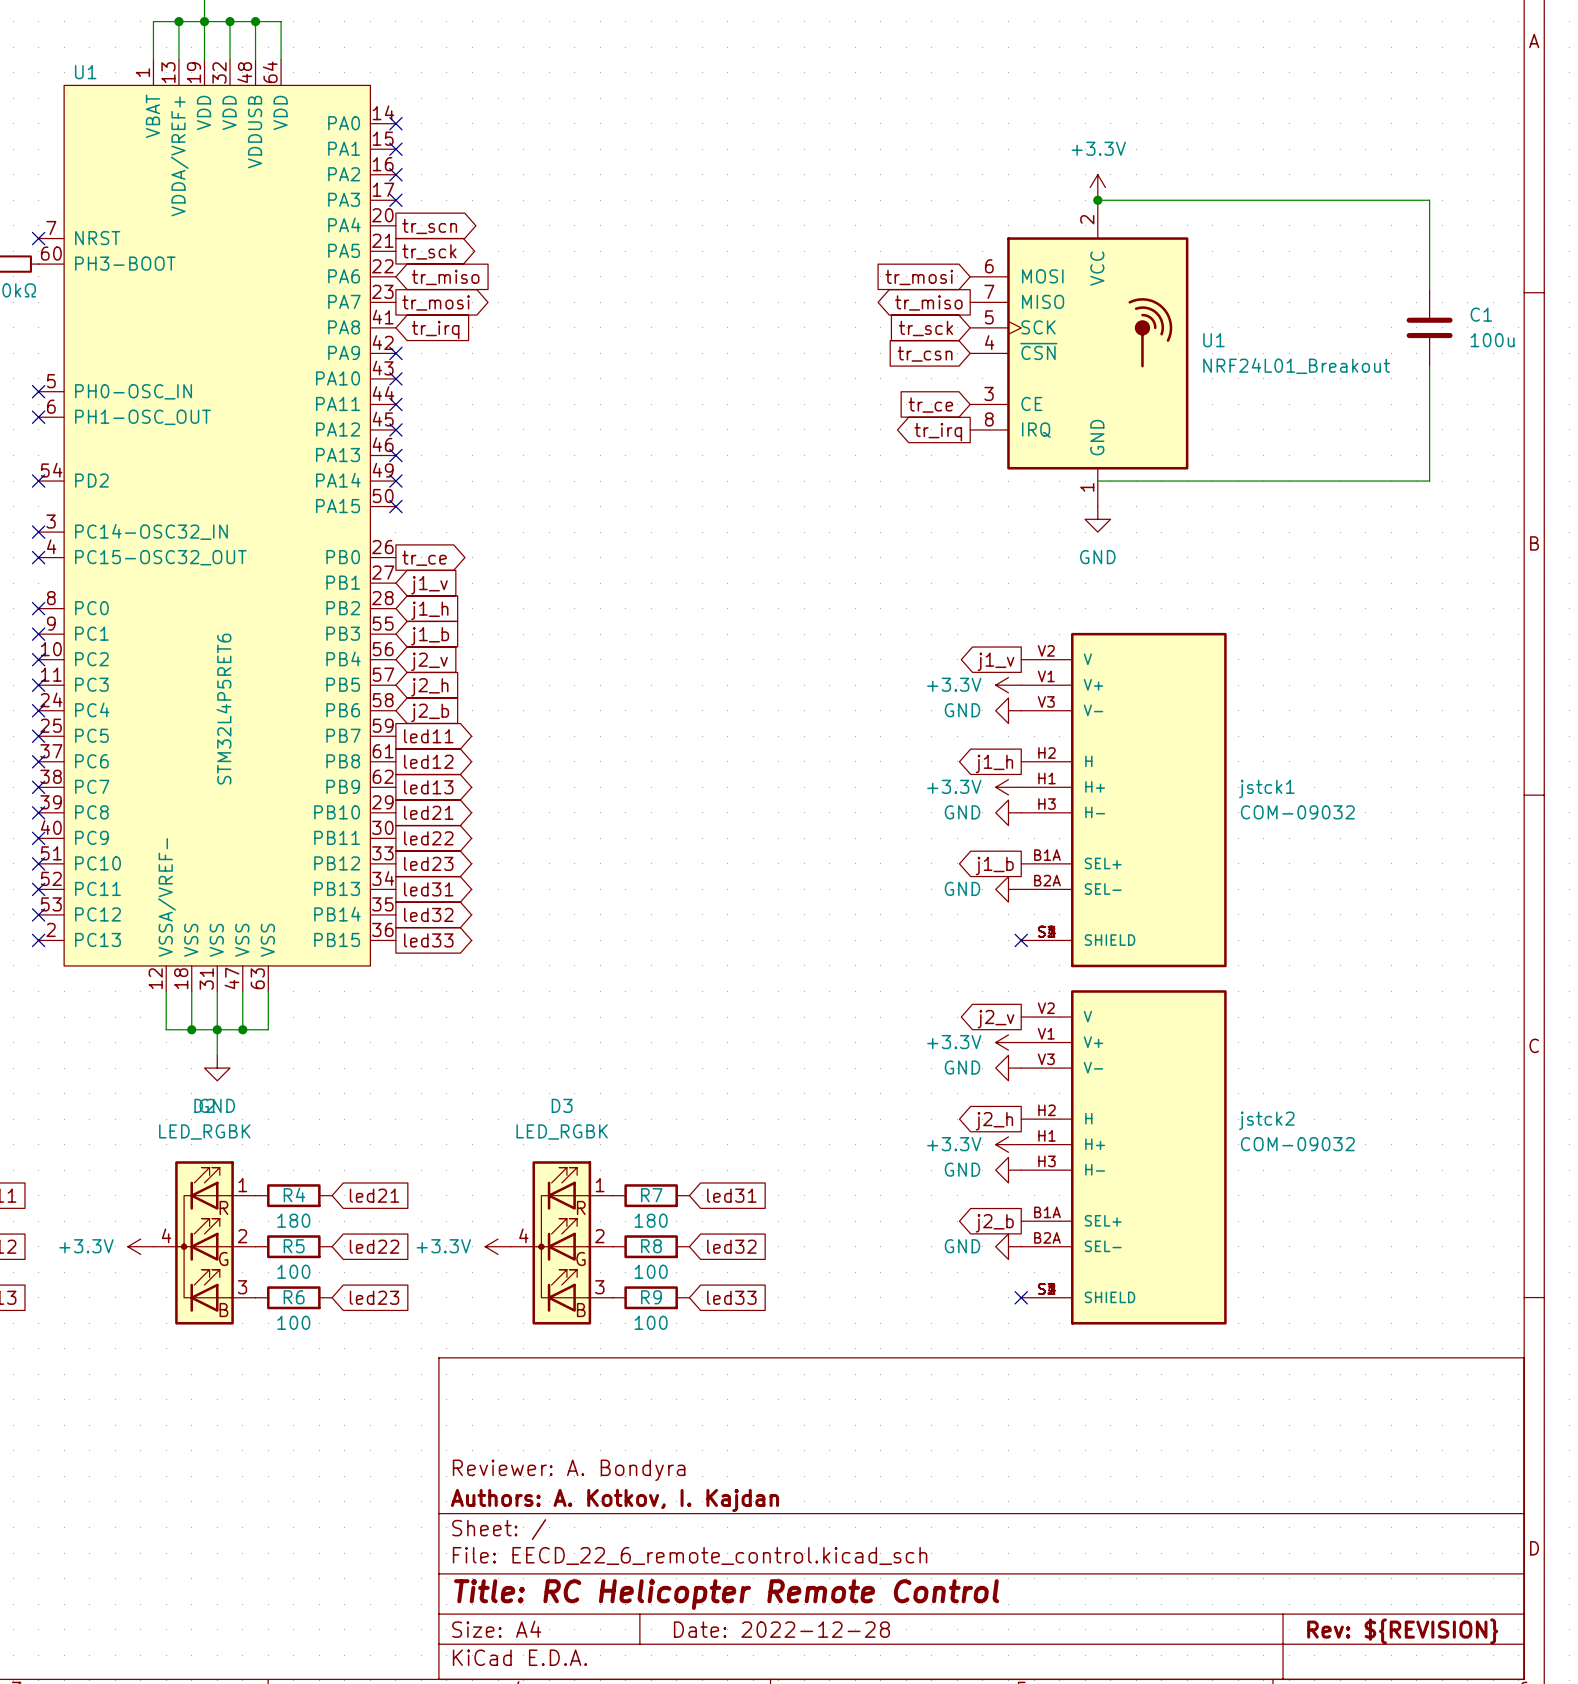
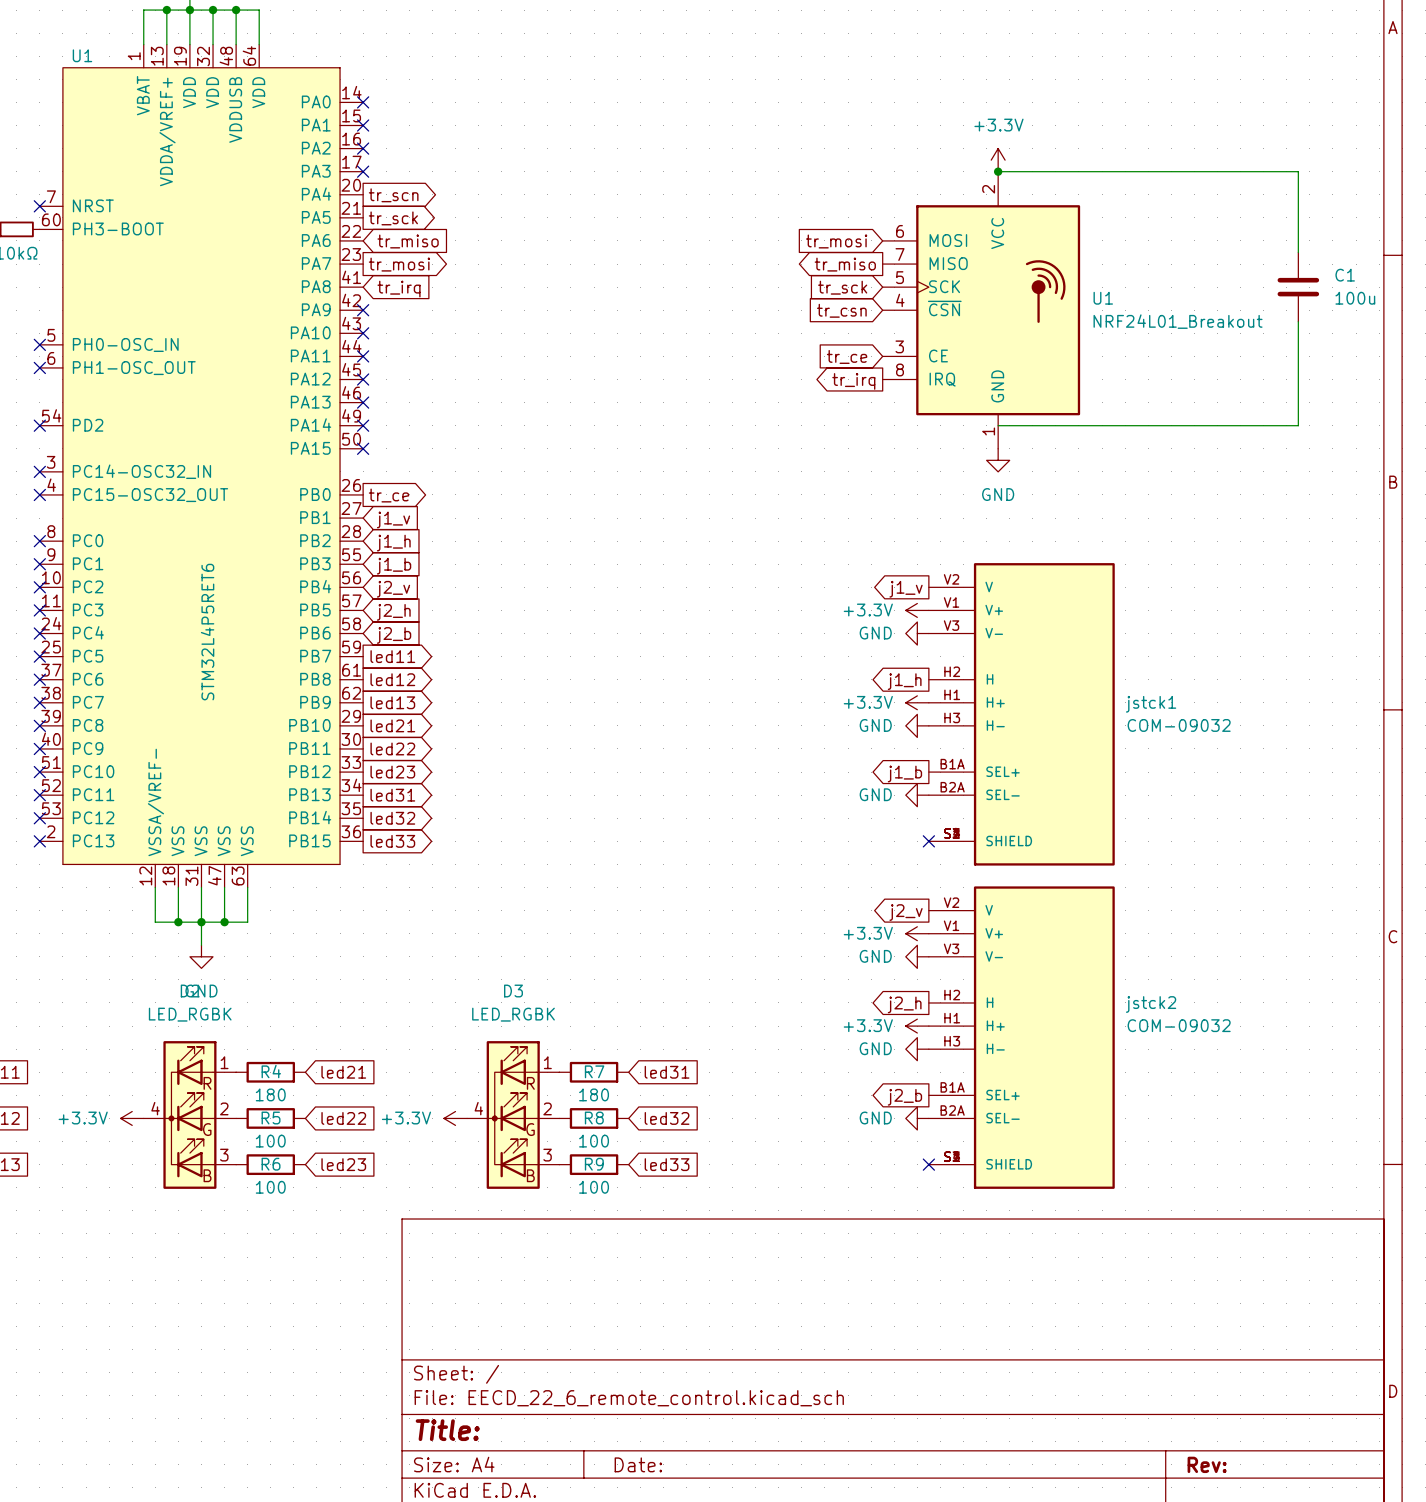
title block: Reviewer: A. Bondyra (569, 1470) -> none
title block: Authors: A. Kotkov, I. Kajdan (614, 1500) -> none
title block: Title: RC Helicopter Remote Control (726, 1594) -> Title: (447, 1430)
title block: Date: 2022-12-28 (781, 1629) -> Date: (638, 1464)
title block: Rev: ${REVISION} (1402, 1631) -> Rev: (1207, 1464)

